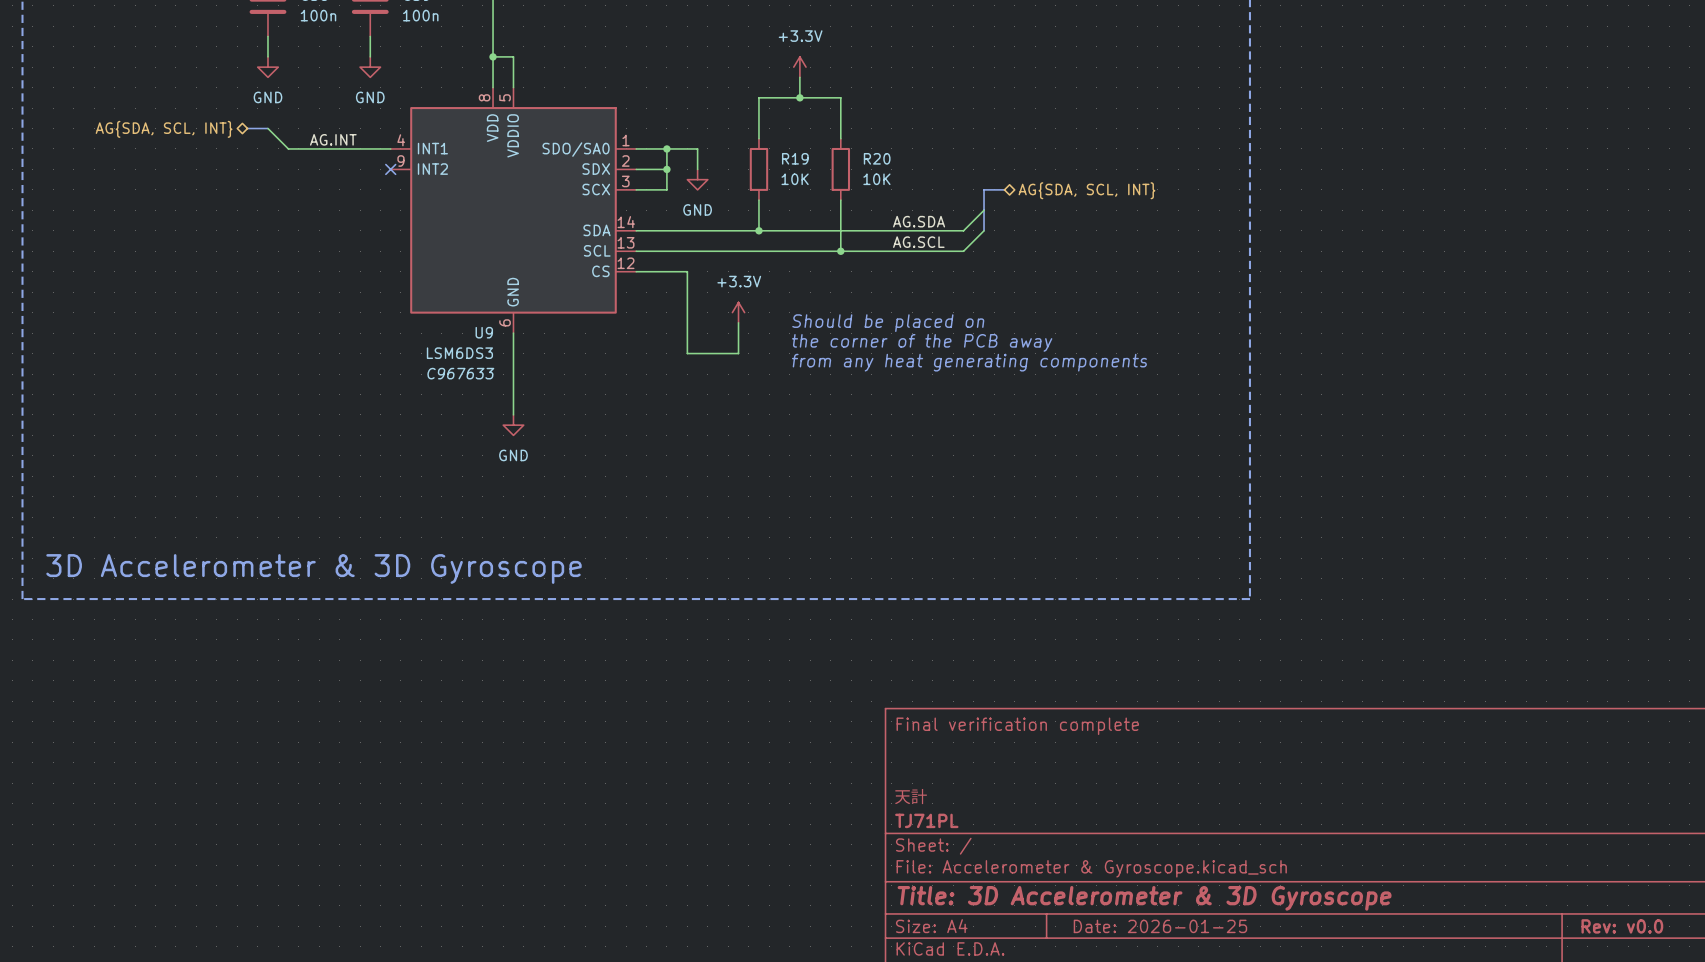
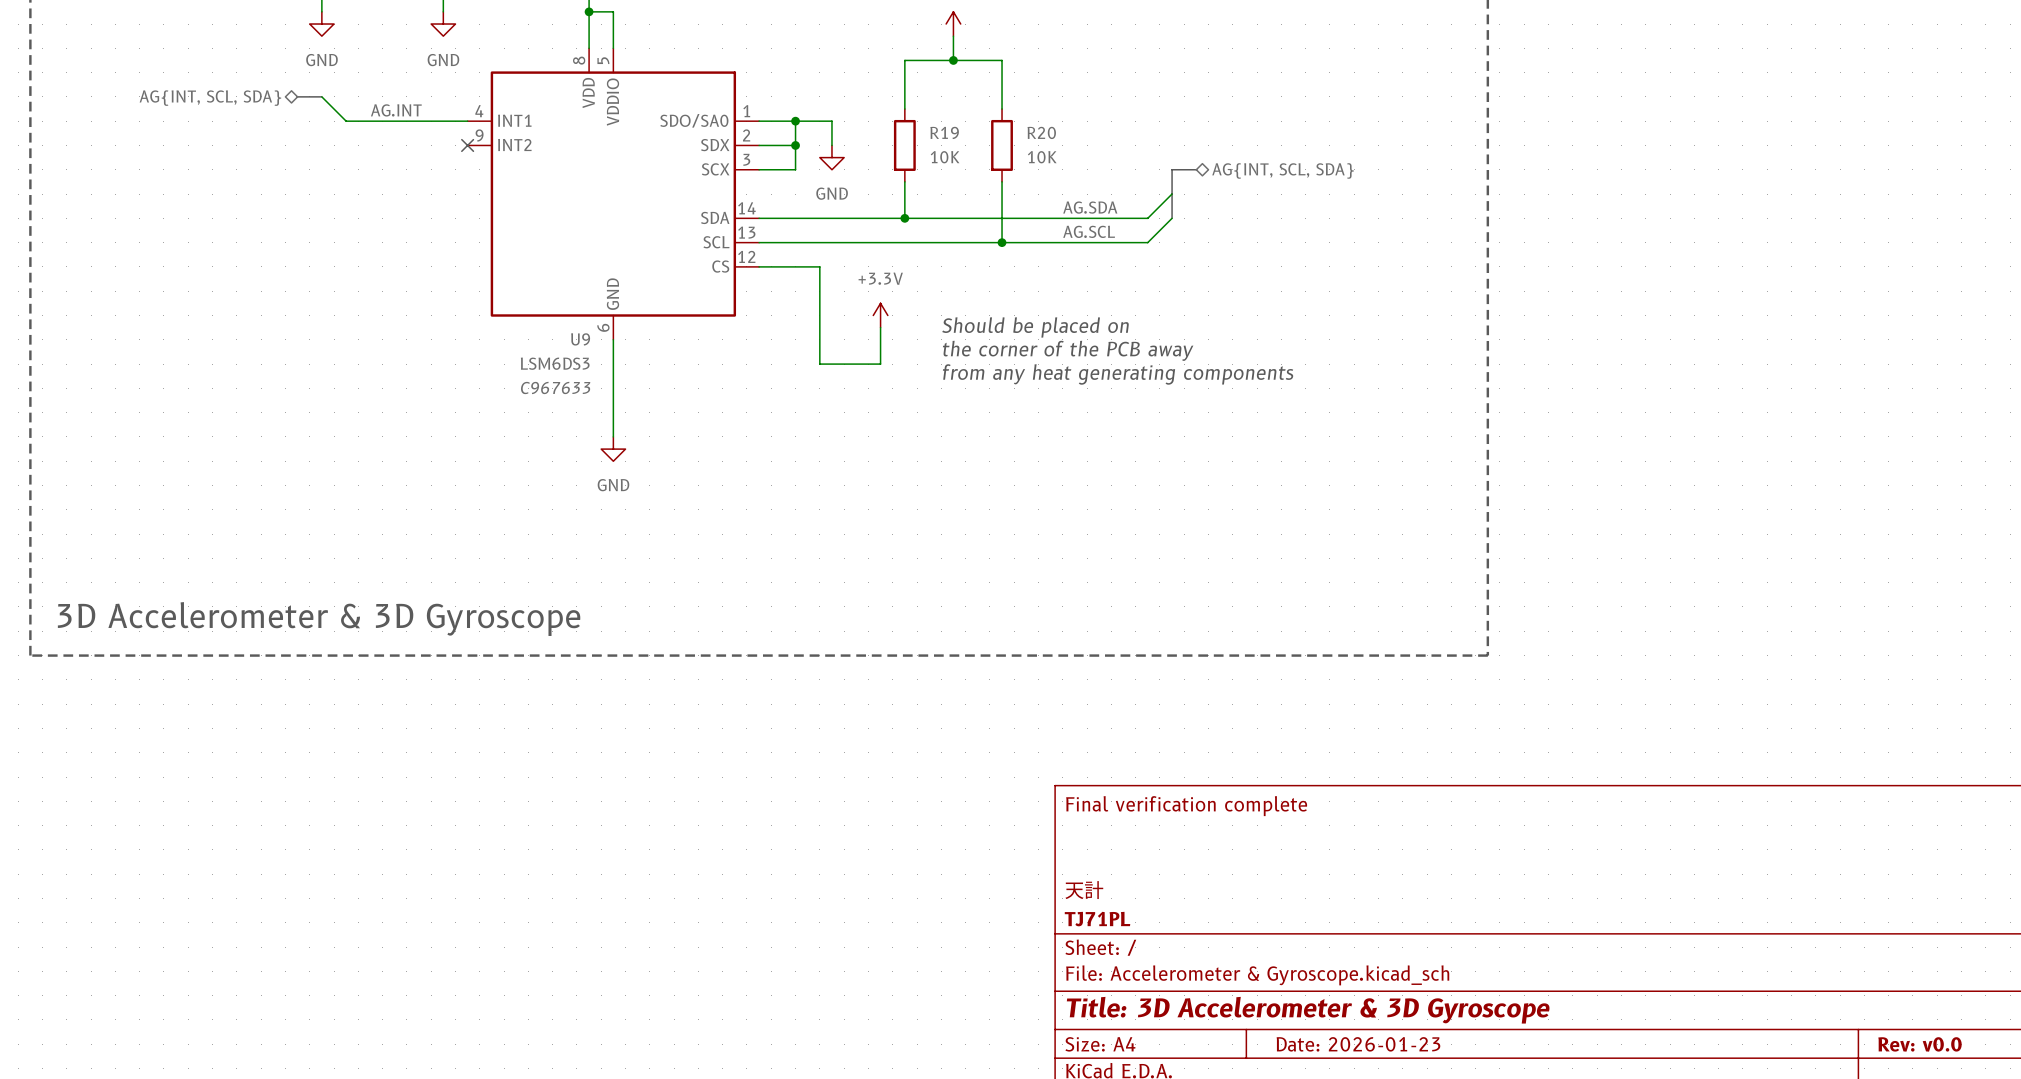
hierarchical label: AG{SDA, SCL, INT} (164, 129) -> AG{INT, SCL, SDA} (210, 98)
hierarchical label: AG{SDA, SCL, INT} (1086, 190) -> AG{INT, SCL, SDA} (1283, 170)
title block: Date: 2026-01-25 (1160, 926) -> Date: 2026-01-23 (1358, 1044)

